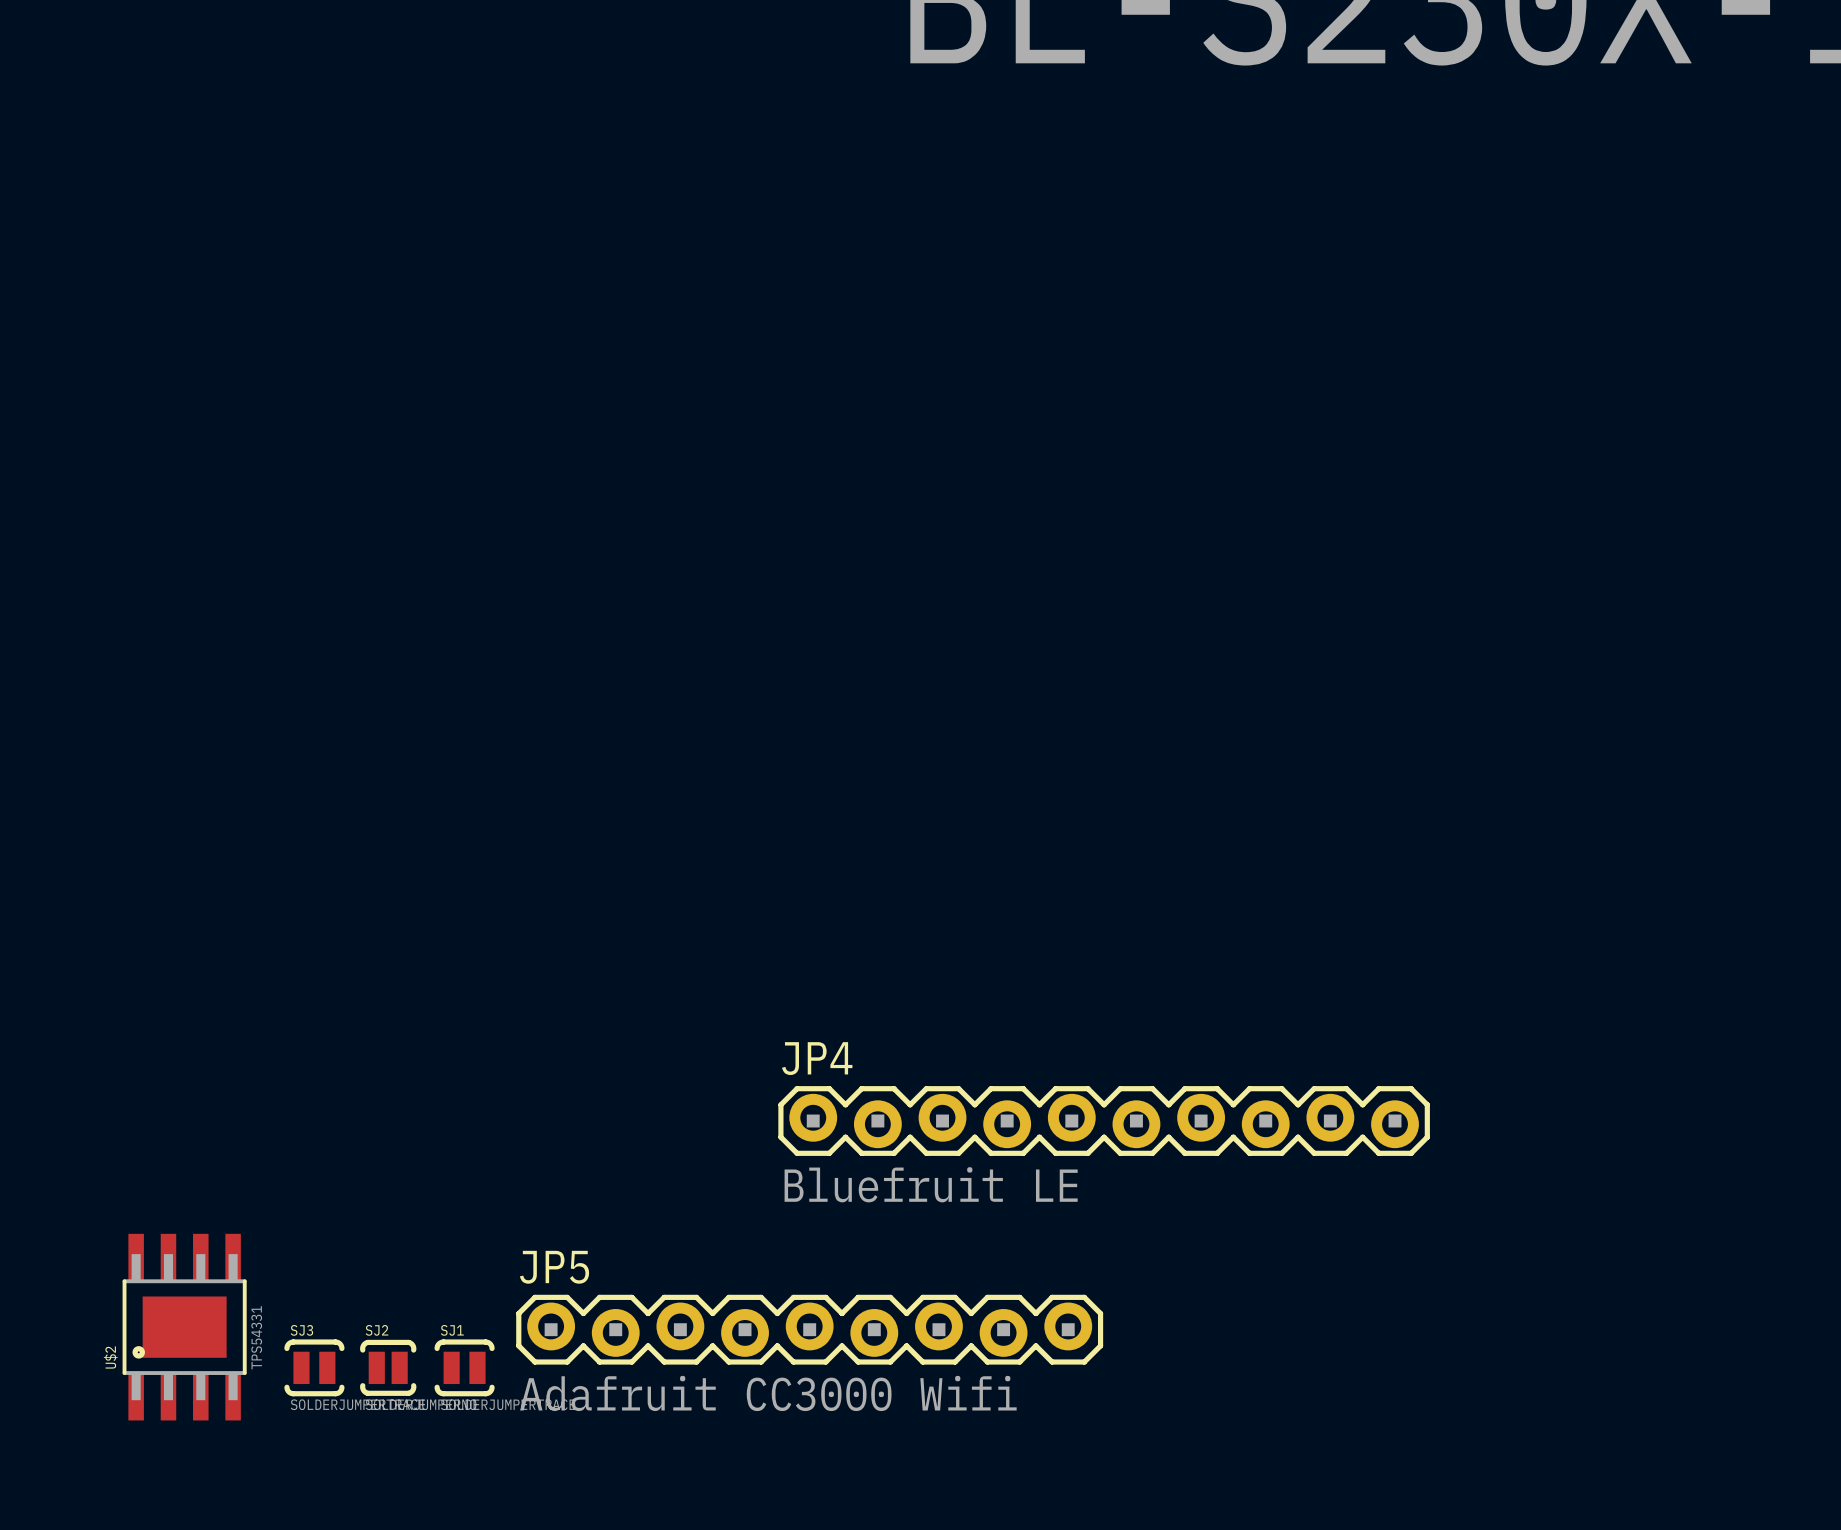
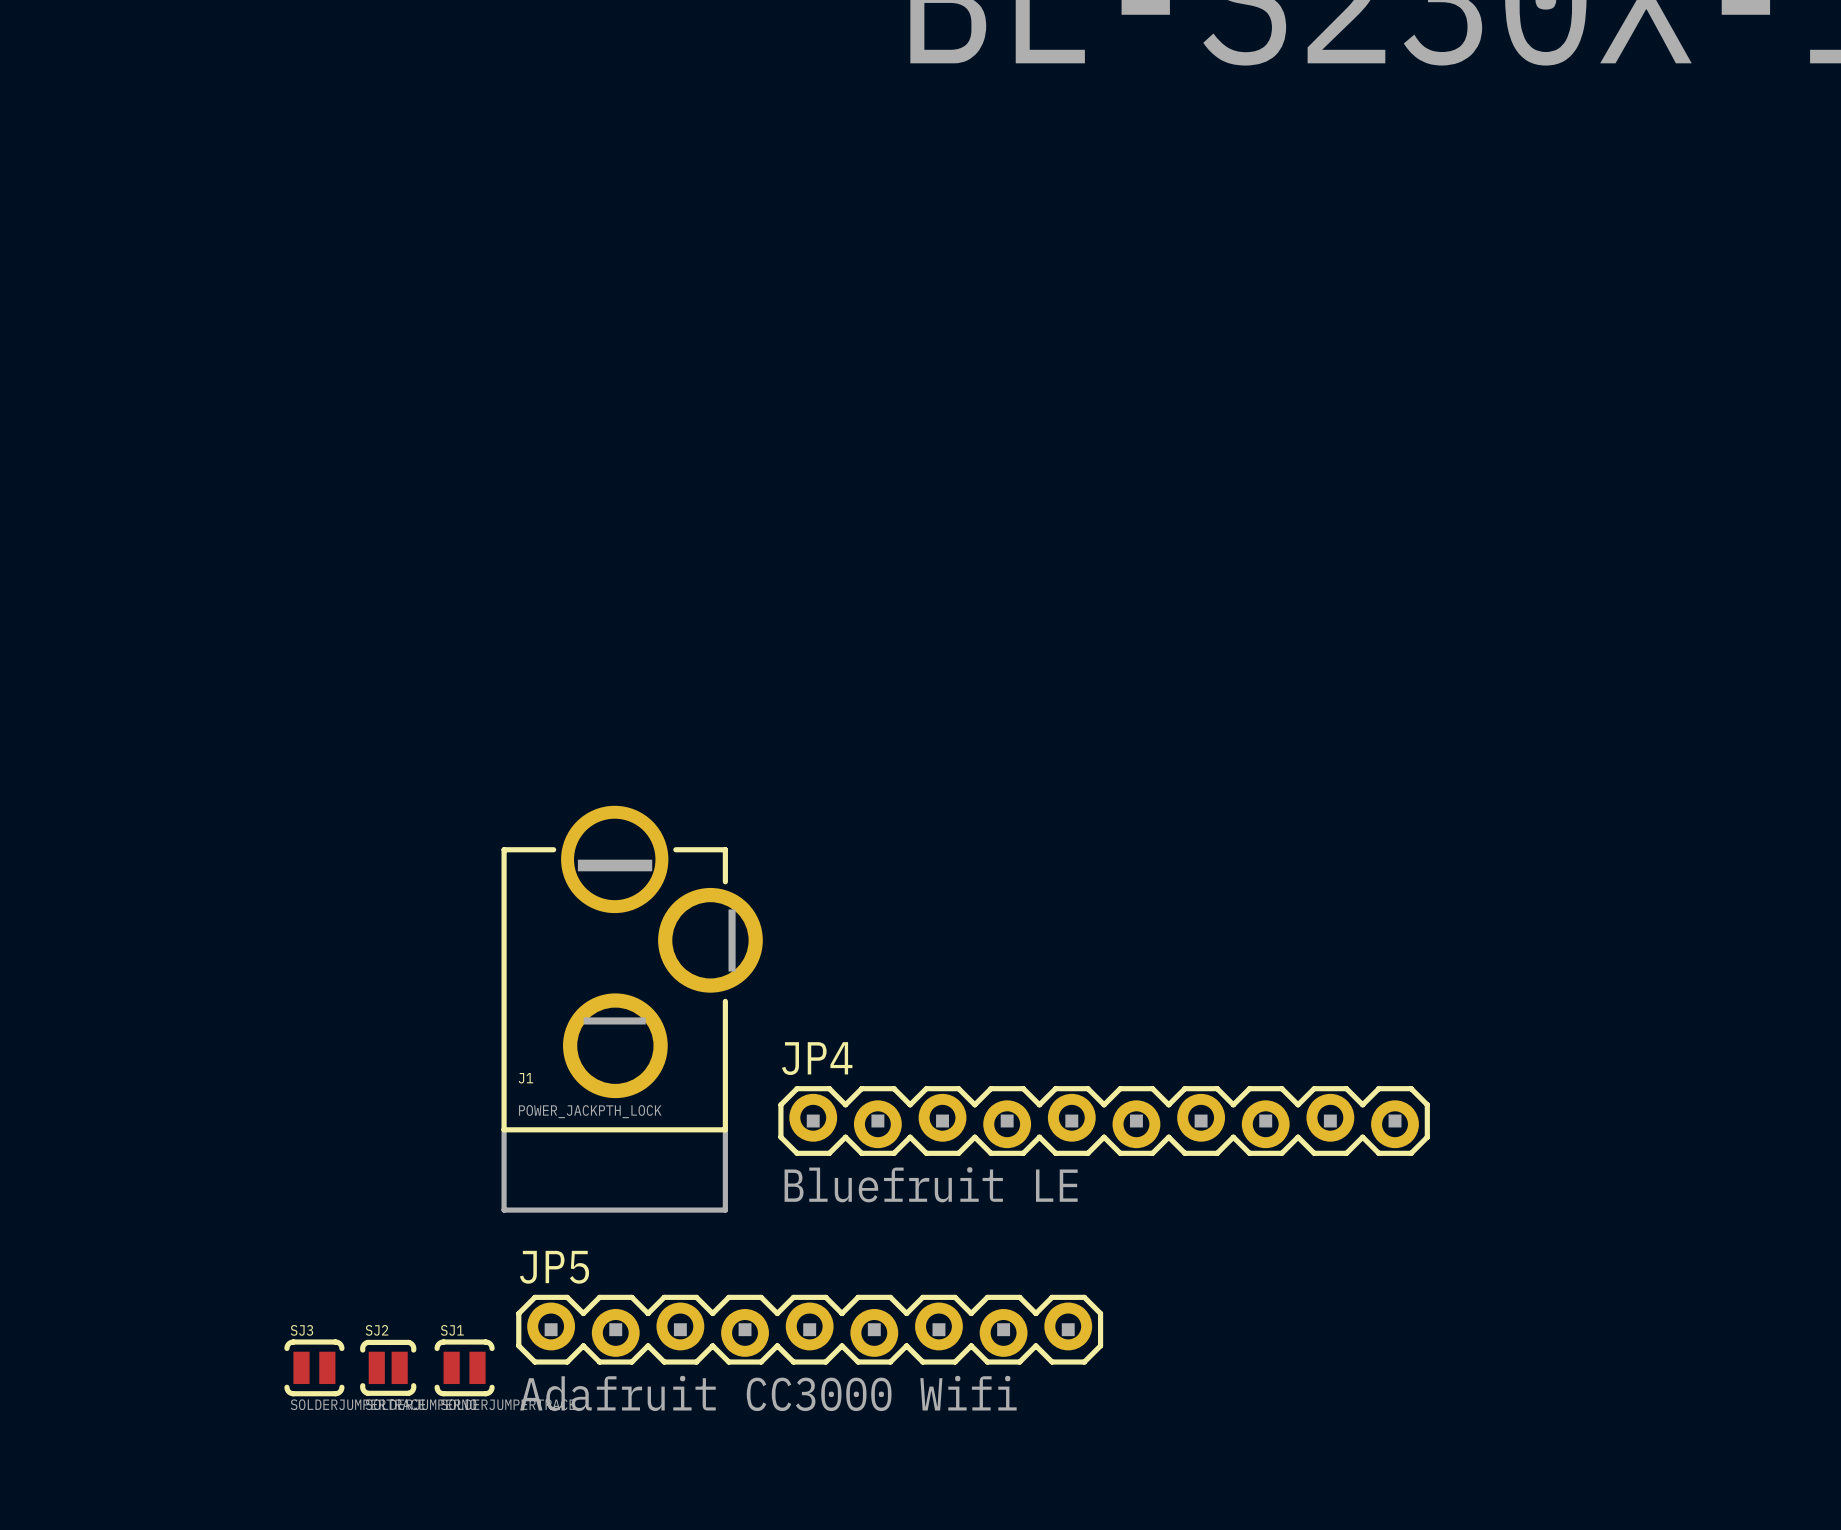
J1: none -> POWER_JACKPTH_LOCK (632, 1009)
U$2: TPS54331 (184, 1327) -> none

